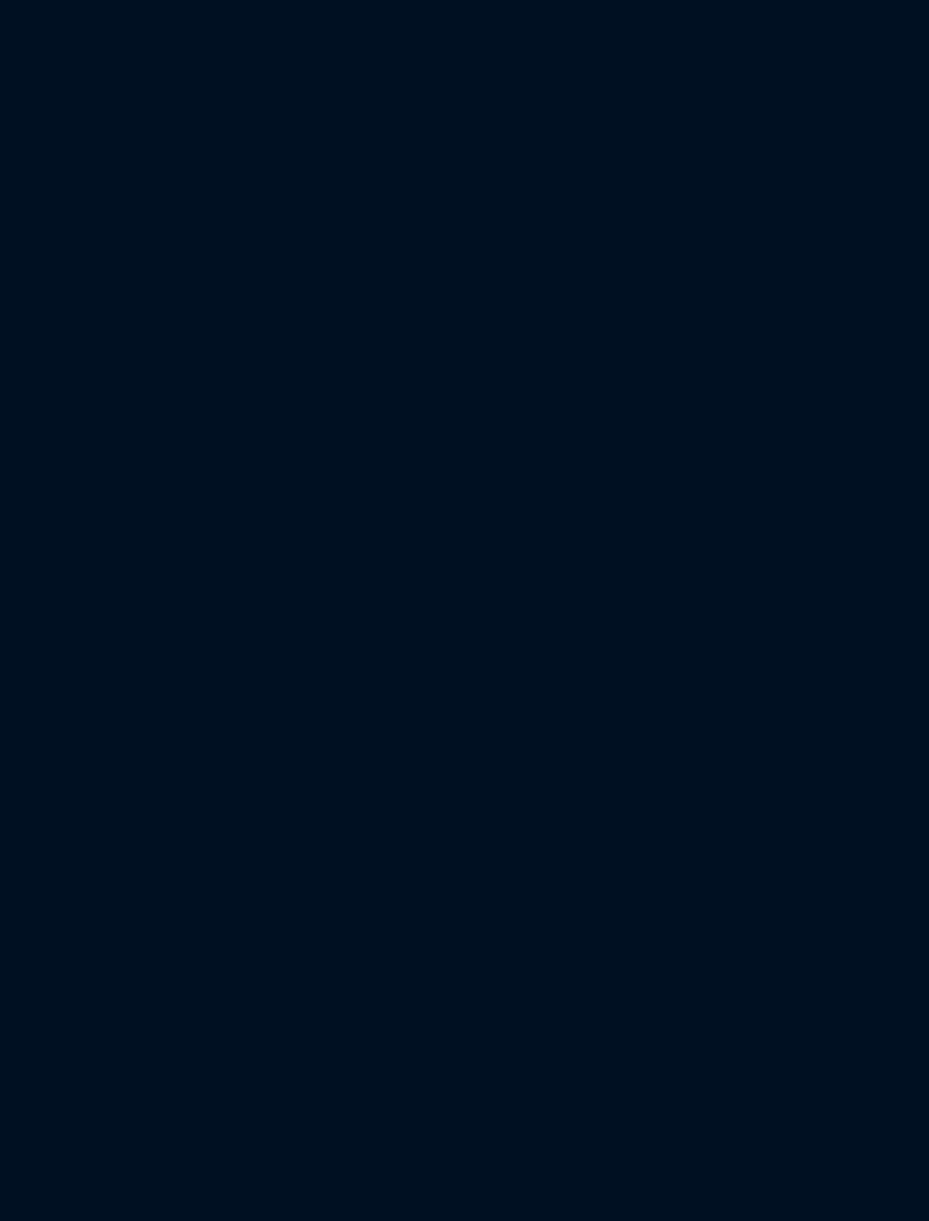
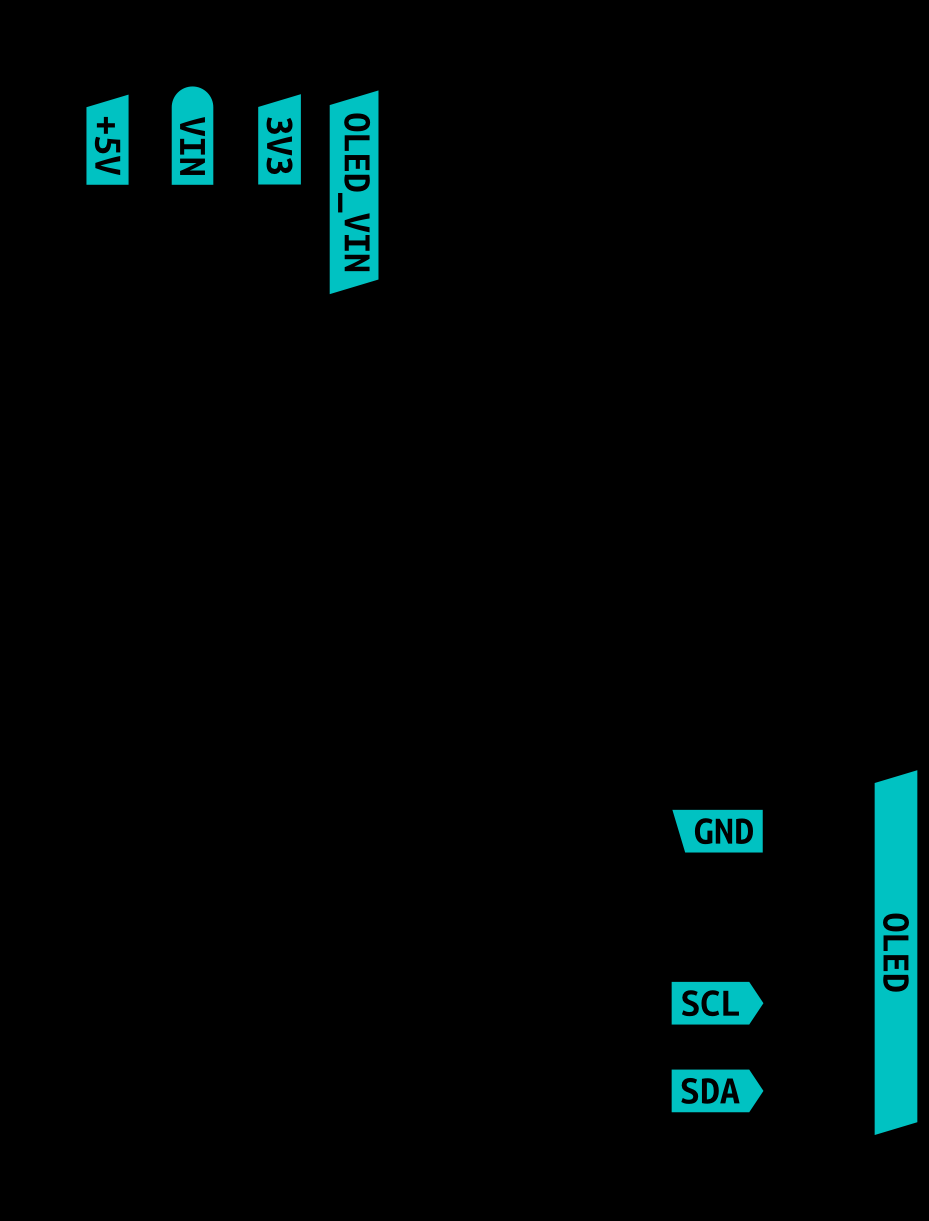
drawing: none -> [171, 86, 214, 185]
drawing: none -> [258, 90, 379, 295]
drawing: none -> [86, 94, 129, 185]
drawing: none -> [874, 770, 918, 1136]
drawing: none -> [672, 809, 763, 853]
drawing: none -> [671, 981, 764, 1025]
drawing: none -> [671, 1069, 764, 1113]

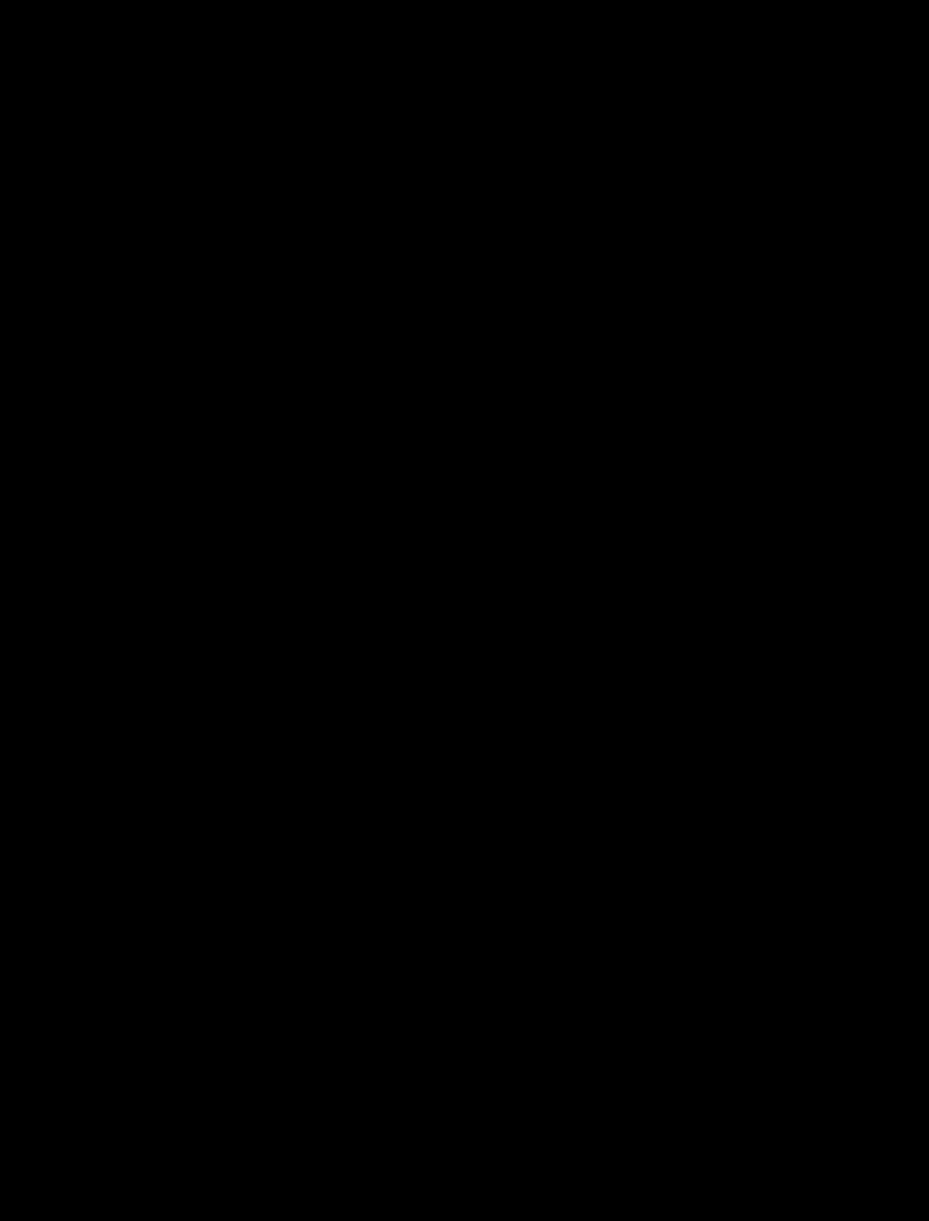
drawing: [171, 86, 214, 185] -> none
drawing: [258, 90, 379, 295] -> none
drawing: [86, 94, 129, 185] -> none
drawing: [874, 770, 918, 1136] -> none
drawing: [672, 809, 763, 853] -> none
drawing: [671, 981, 764, 1025] -> none
drawing: [671, 1069, 764, 1113] -> none

